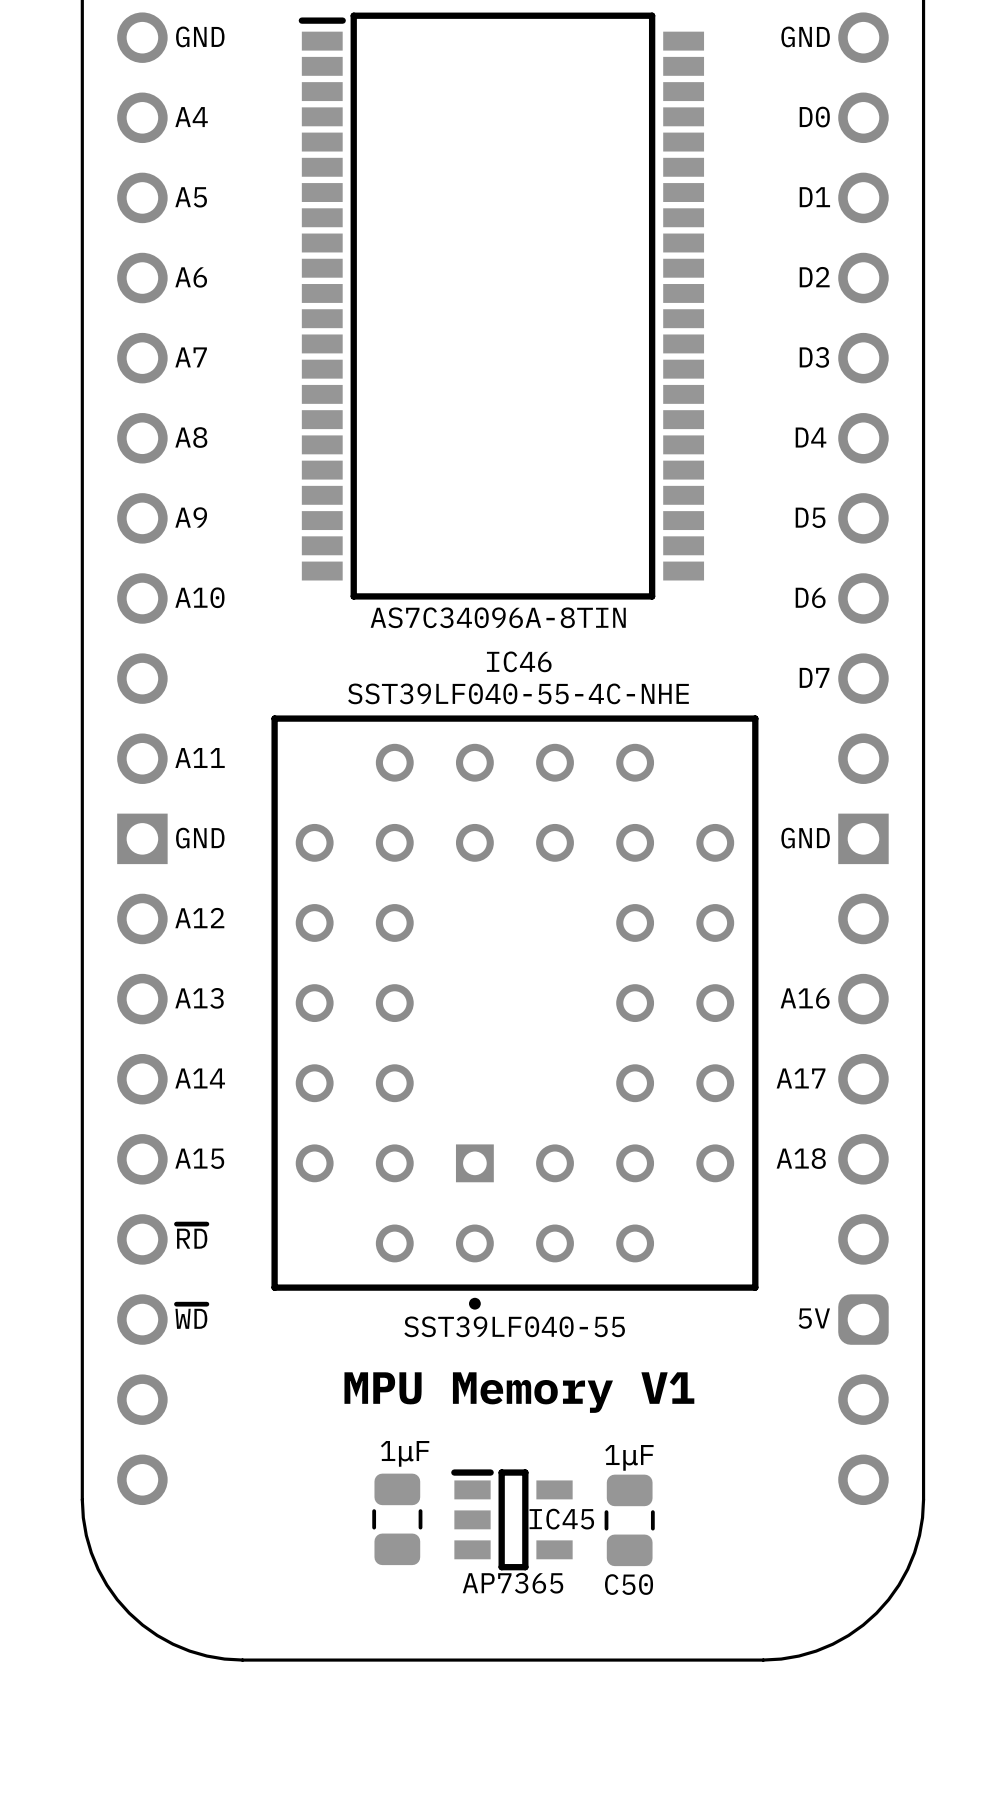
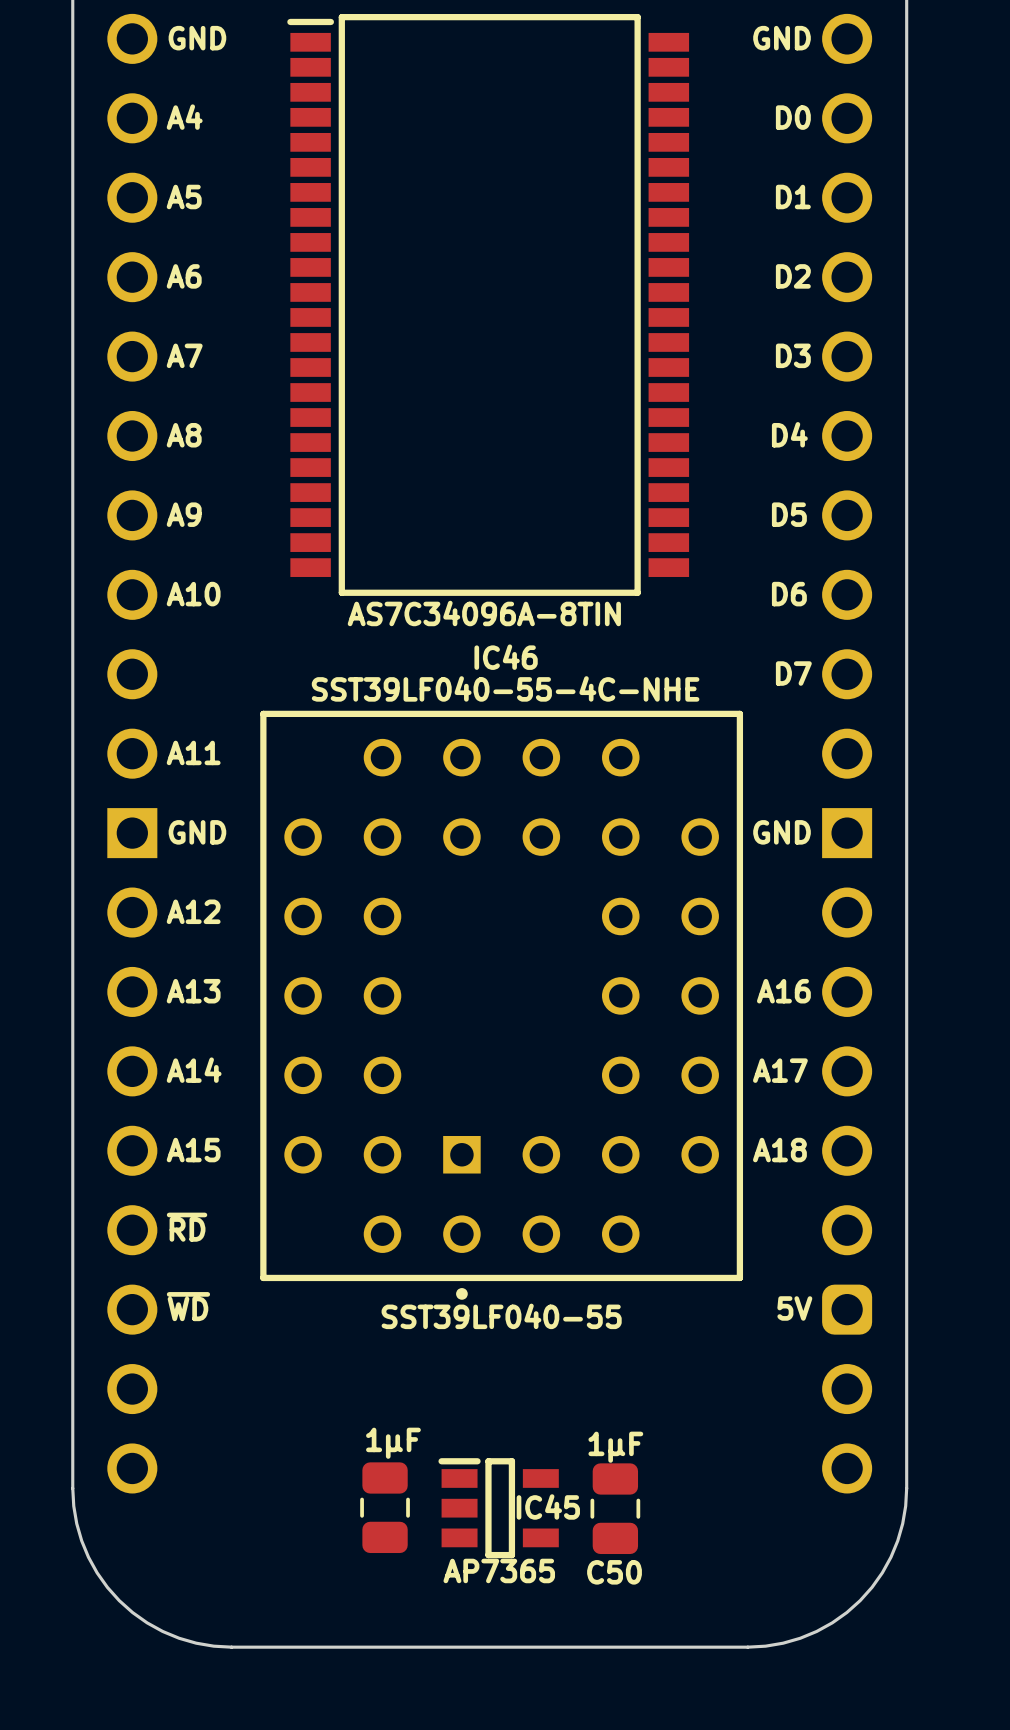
text: MPU Memory V1 (519, 1392) -> none

